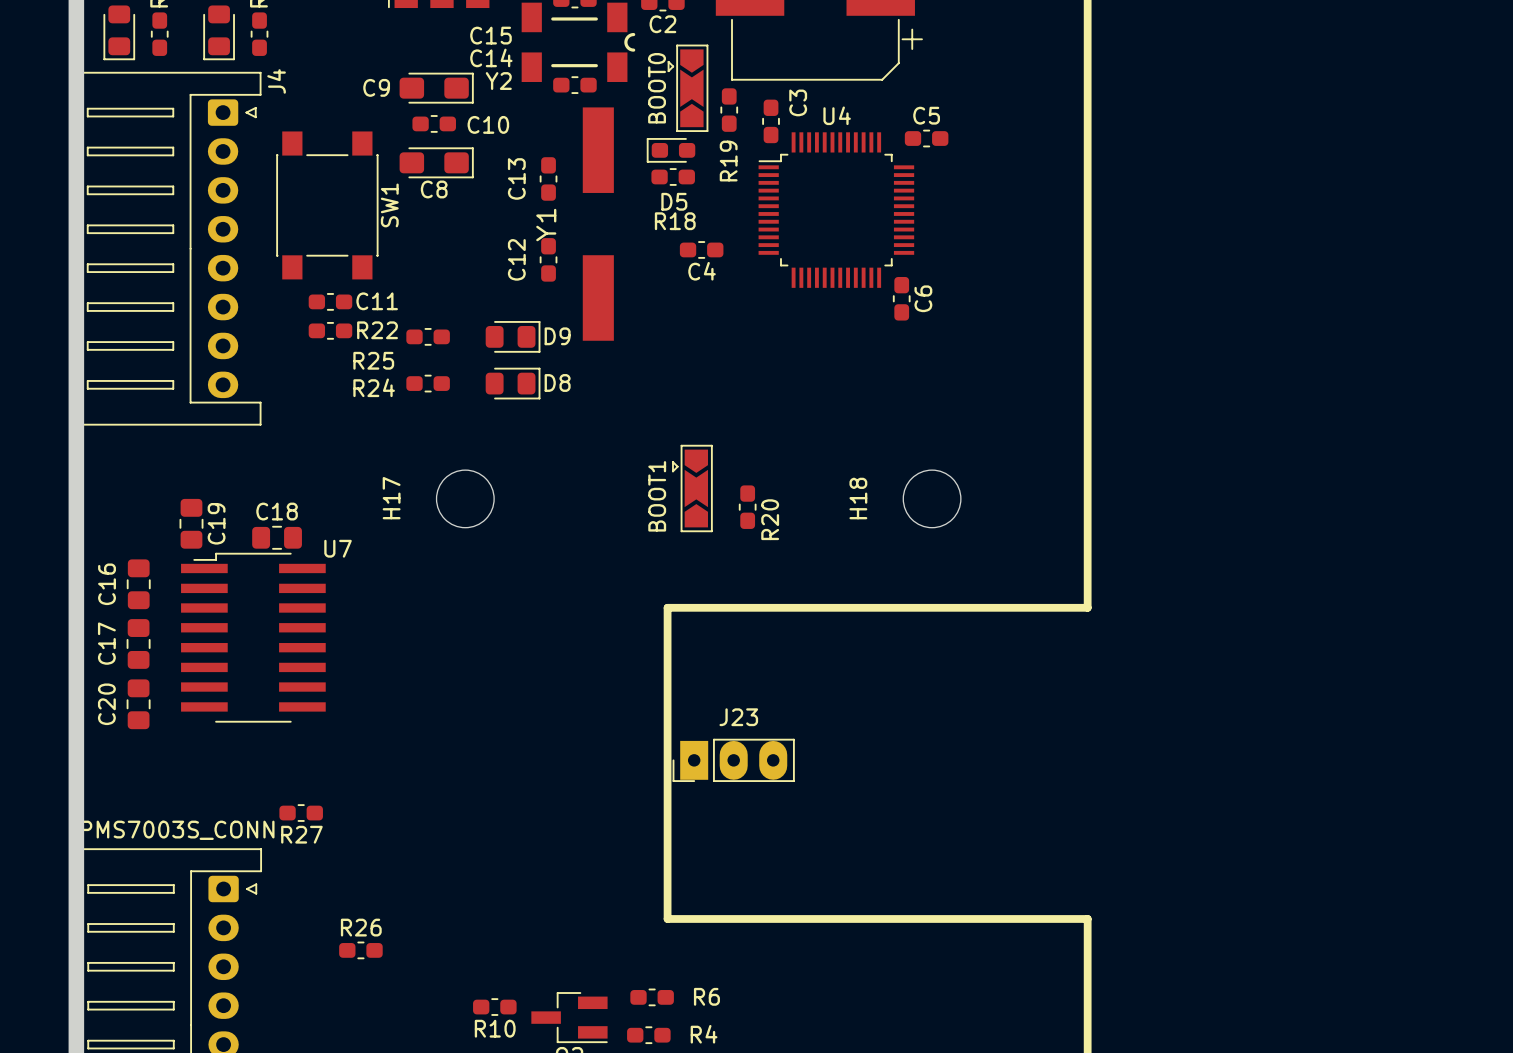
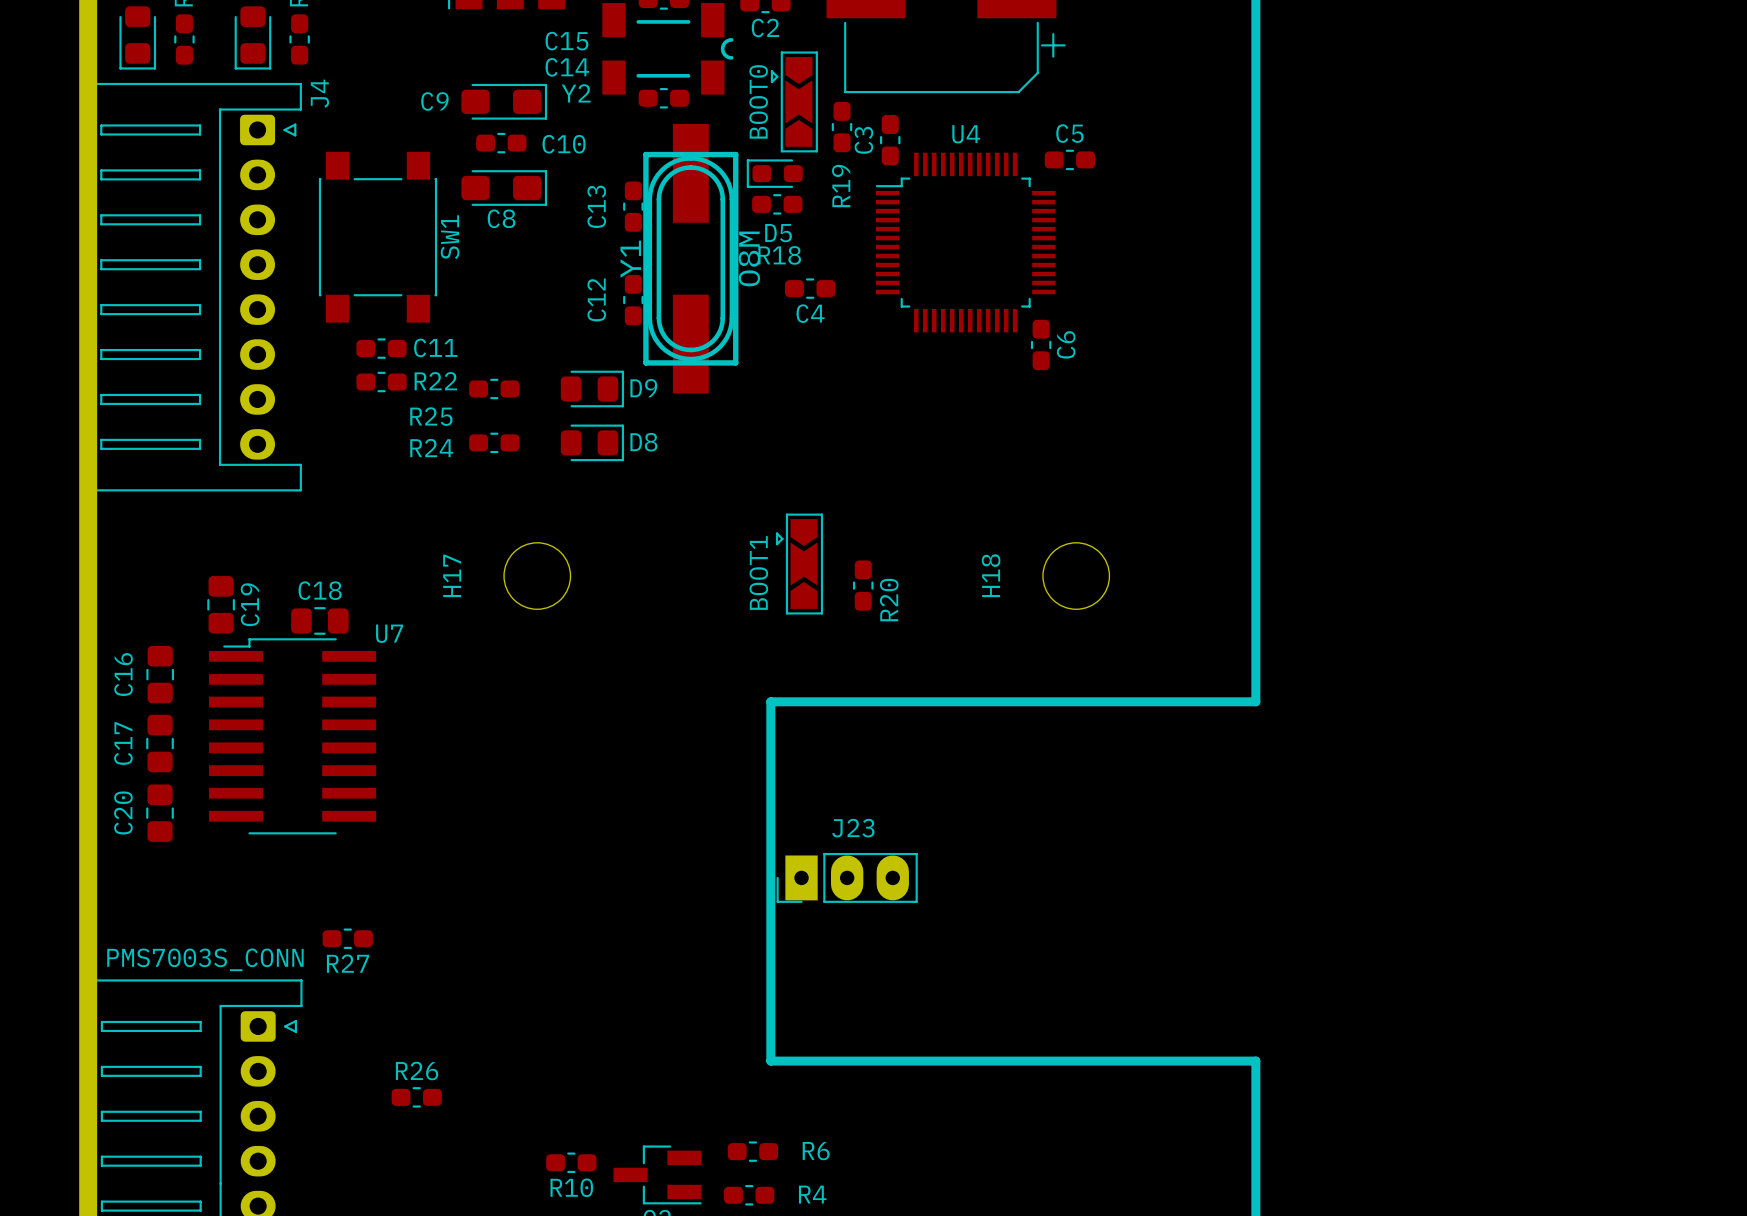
C3 name position: C3 (798, 102) -> C3 (863, 140)
Y1 footprint: [582, 107, 614, 341] -> [643, 124, 739, 394]
Y1 value: none -> O8M (749, 258)

